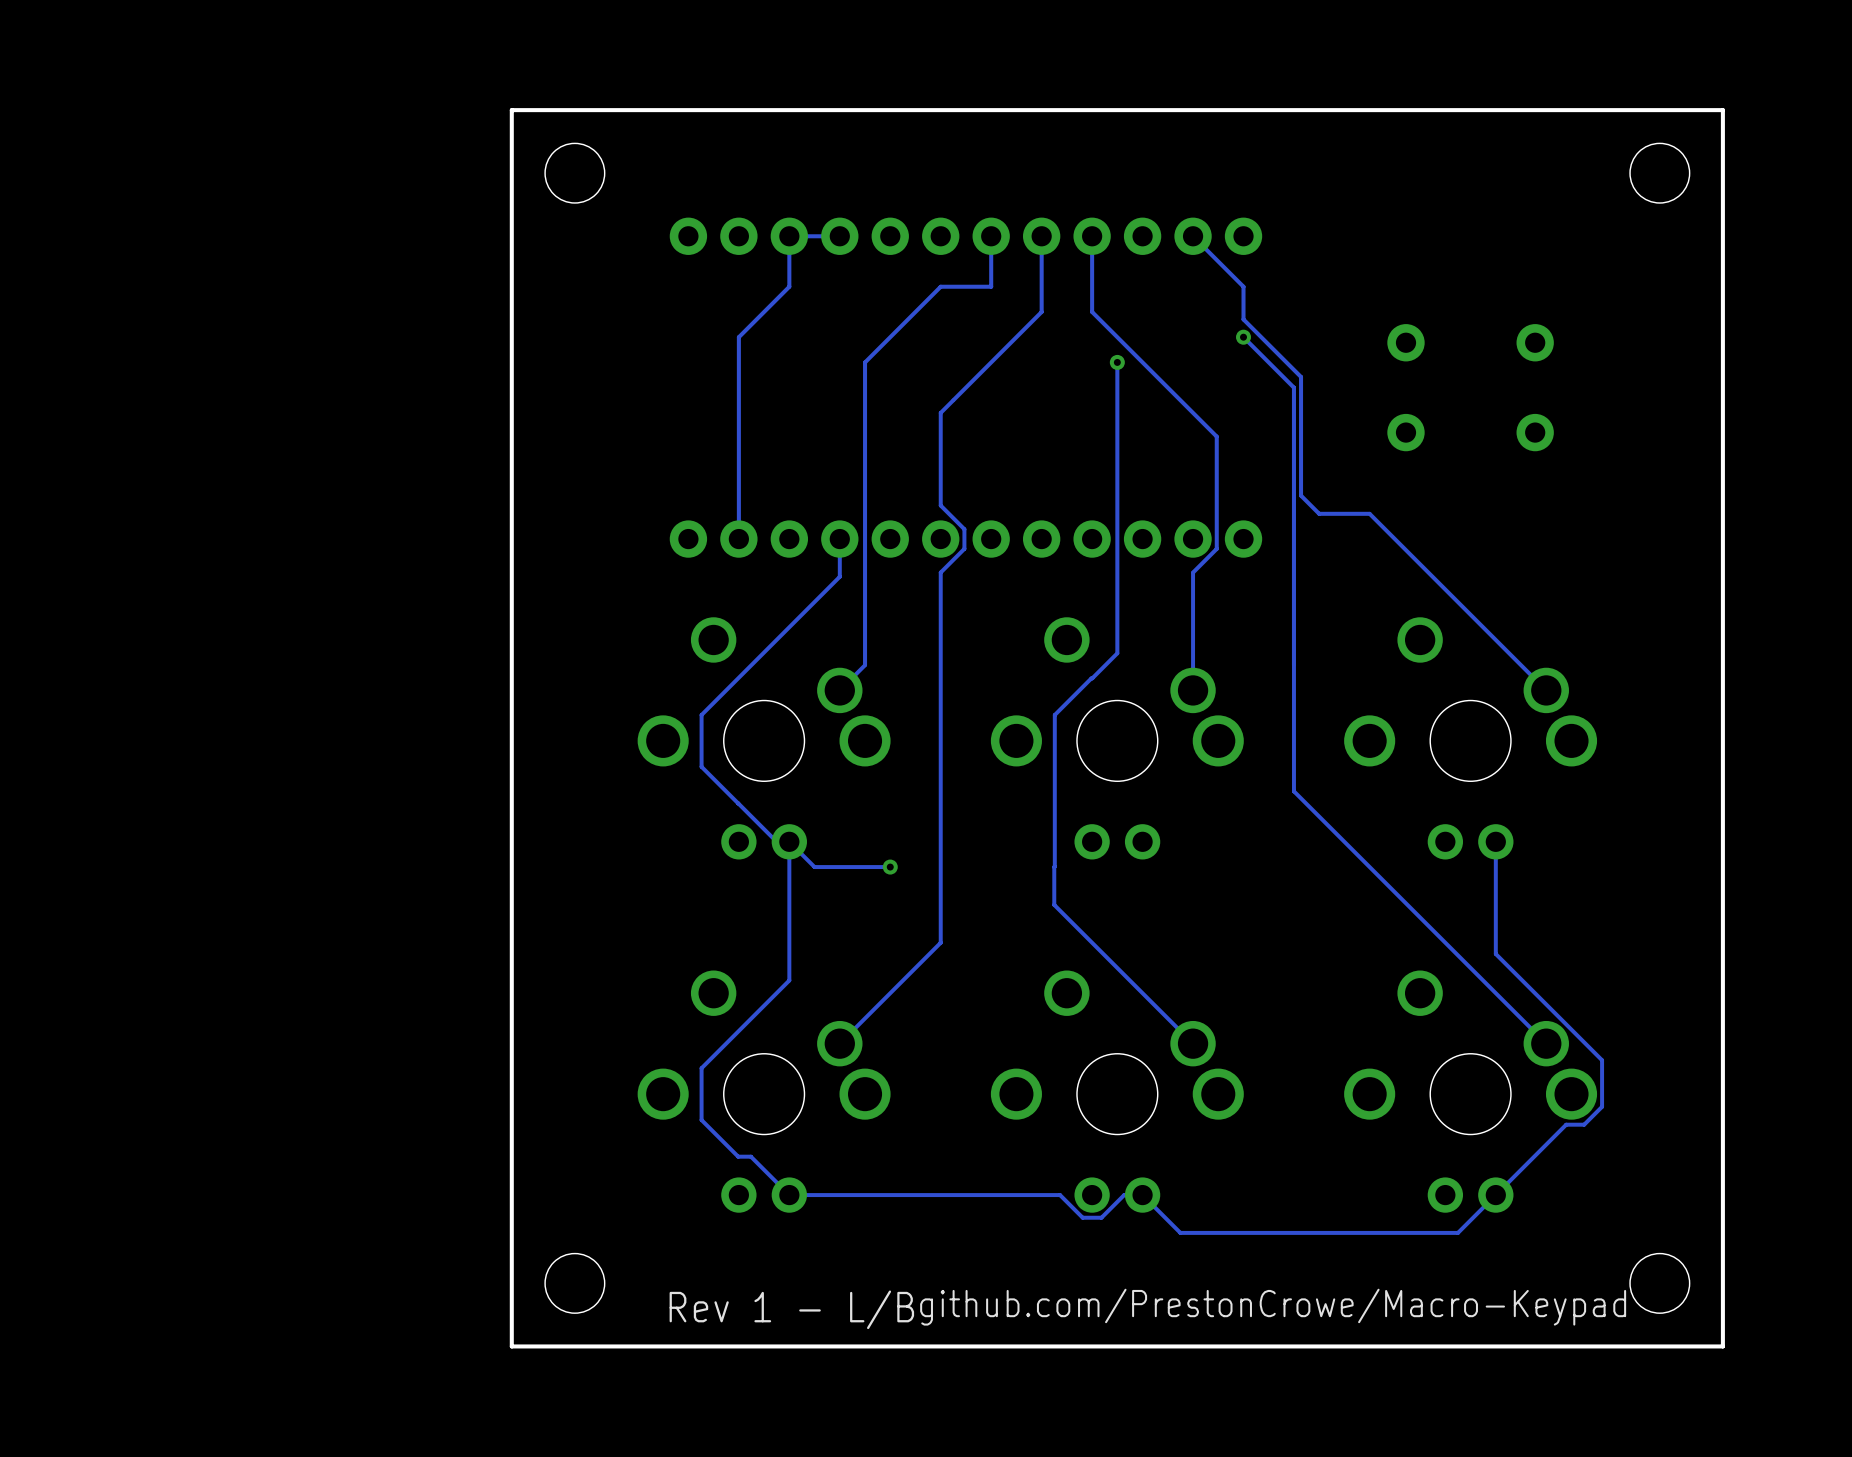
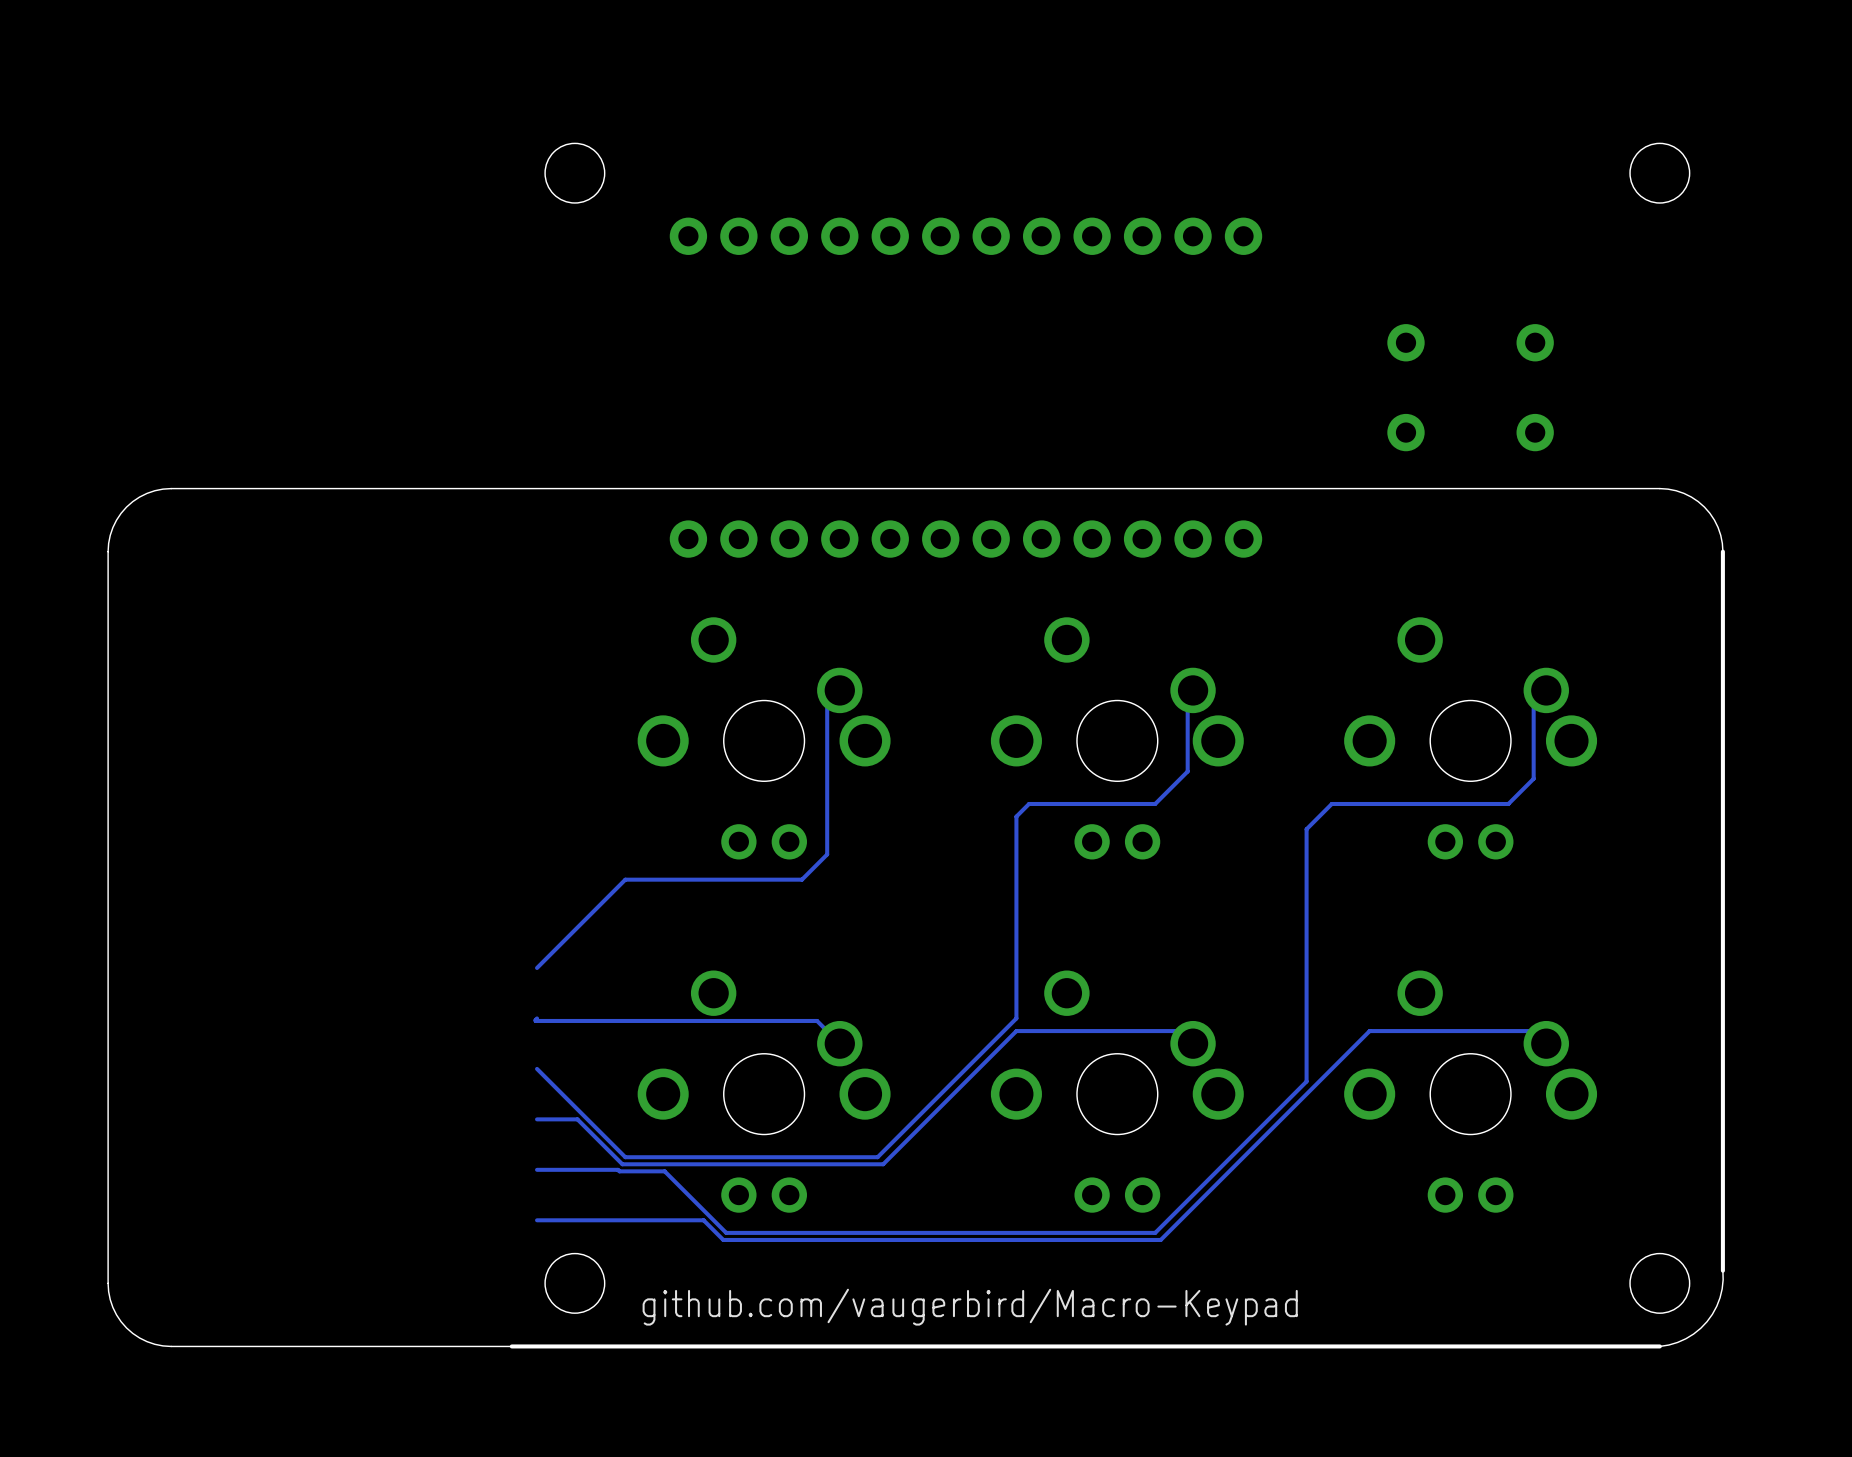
track: (839, 236) (789, 236) (789, 286) (738, 337) (738, 539) -> none
track: (991, 236) (991, 286) (940, 286) (865, 362) (865, 665) (839, 690) -> (537, 967) (625, 879) (801, 879) (827, 854) (827, 703) (839, 690)
track: (1041, 236) (1041, 311) (940, 412) (940, 505) (964, 529) (964, 548) (940, 572) (940, 942) (839, 1043) -> (537, 1018) (535, 1020) (817, 1020) (839, 1043)
track: (1092, 236) (1092, 311) (1216, 436) (1216, 548) (1193, 572) (1193, 690) -> (537, 1068) (625, 1157) (877, 1157) (1016, 1018) (1016, 816) (1029, 803) (1155, 803) (1187, 771) (1187, 695) (1193, 690)
track: (1193, 236) (1243, 286) (1243, 319) (1301, 376) (1301, 495) (1319, 513) (1369, 513) (1546, 690) -> (537, 1169) (664, 1171) (726, 1232) (1155, 1232) (1306, 1081) (1306, 829) (1331, 803) (1508, 803) (1533, 778) (1533, 703) (1546, 690)
track: (1243, 337) (1293, 387) (1293, 791) (1533, 1031) -> (537, 1220) (703, 1220) (723, 1239) (1160, 1239) (1369, 1031) (1533, 1031)
via: (1243, 337) -> none
track: (1117, 362) (1117, 653) (1054, 714) (1054, 904) (1180, 1031) -> (537, 1119) (577, 1119) (622, 1164) (883, 1164) (1016, 1031) (1180, 1031)
via: (1117, 362) -> none
track: (839, 539) (839, 576) (701, 714) (701, 766) (776, 841) (789, 841) -> none
board edge: (1722, 551) (1722, 110) (511, 110) (511, 1346) -> (1722, 551) (1718, 527) (1704, 507) (1683, 493) (1659, 488) (171, 488) (154, 490) (139, 497) (126, 507) (116, 520) (110, 535) (108, 551) (108, 1283) (112, 1307) (121, 1321) (132, 1333) (147, 1341) (162, 1345) (511, 1346)
track: (789, 841) (814, 867) (890, 867) -> none
track: (1495, 841) (1495, 954) (1602, 1060) (1602, 1106) (1584, 1124) (1566, 1124) (1457, 1232) (1180, 1232) (1142, 1195) (1124, 1195) (1101, 1217) (1082, 1217) (1060, 1195) (789, 1195) (750, 1156) (738, 1156) (701, 1120) (701, 1068) (789, 980) (789, 841) -> none
via: (890, 867) -> none
board edge: (1722, 1270) (1722, 1346) (1659, 1346) -> (1722, 1270) (1720, 1297) (1707, 1321) (1685, 1338) (1659, 1346)
text: github.com/PrestonCrowe/Macro-Keypad (1273, 1307) -> github.com/vaugerbird/Macro-Keypad (970, 1307)
text: Rev 1 - L/B (791, 1309) -> none

